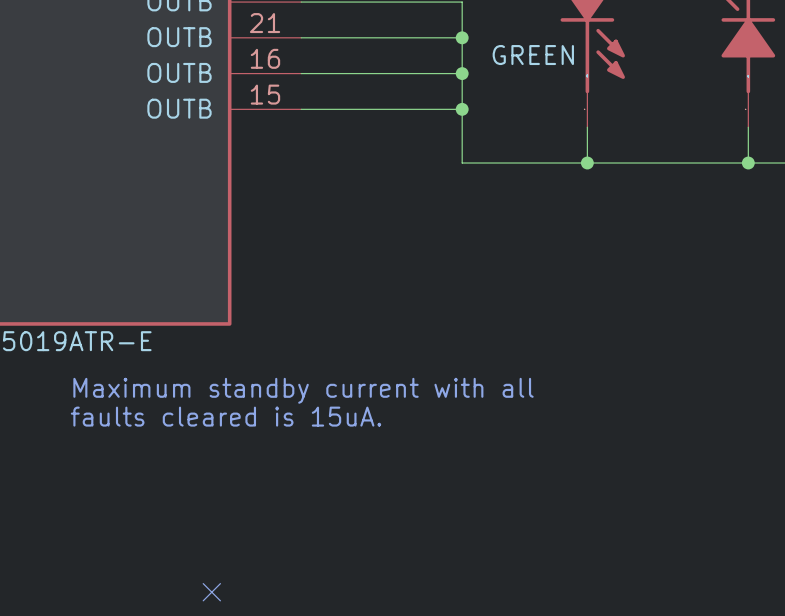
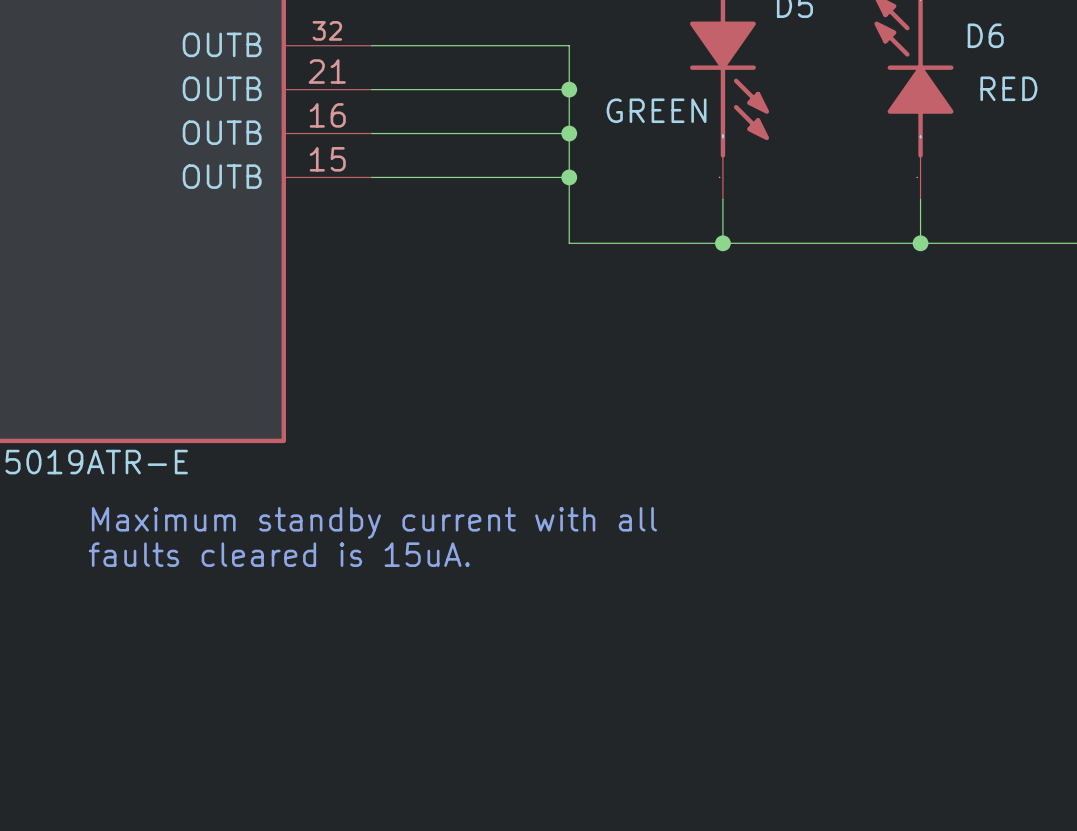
no-connect mark: (211, 592) -> none

